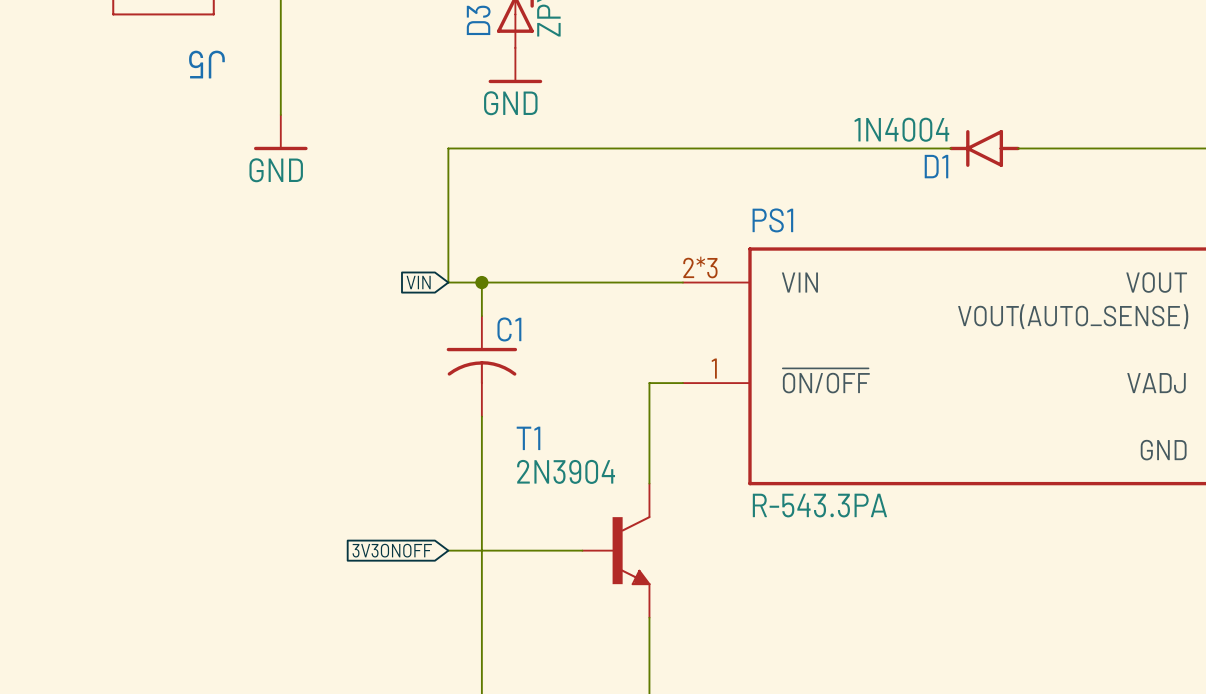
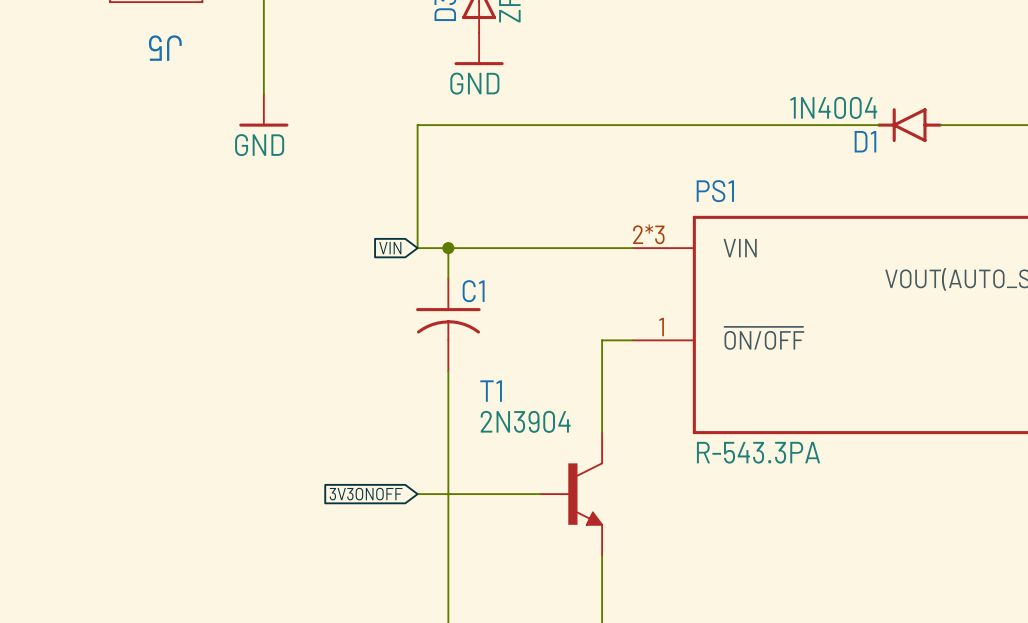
J5 name position: J5 (206, 64) -> J5 (165, 48)

